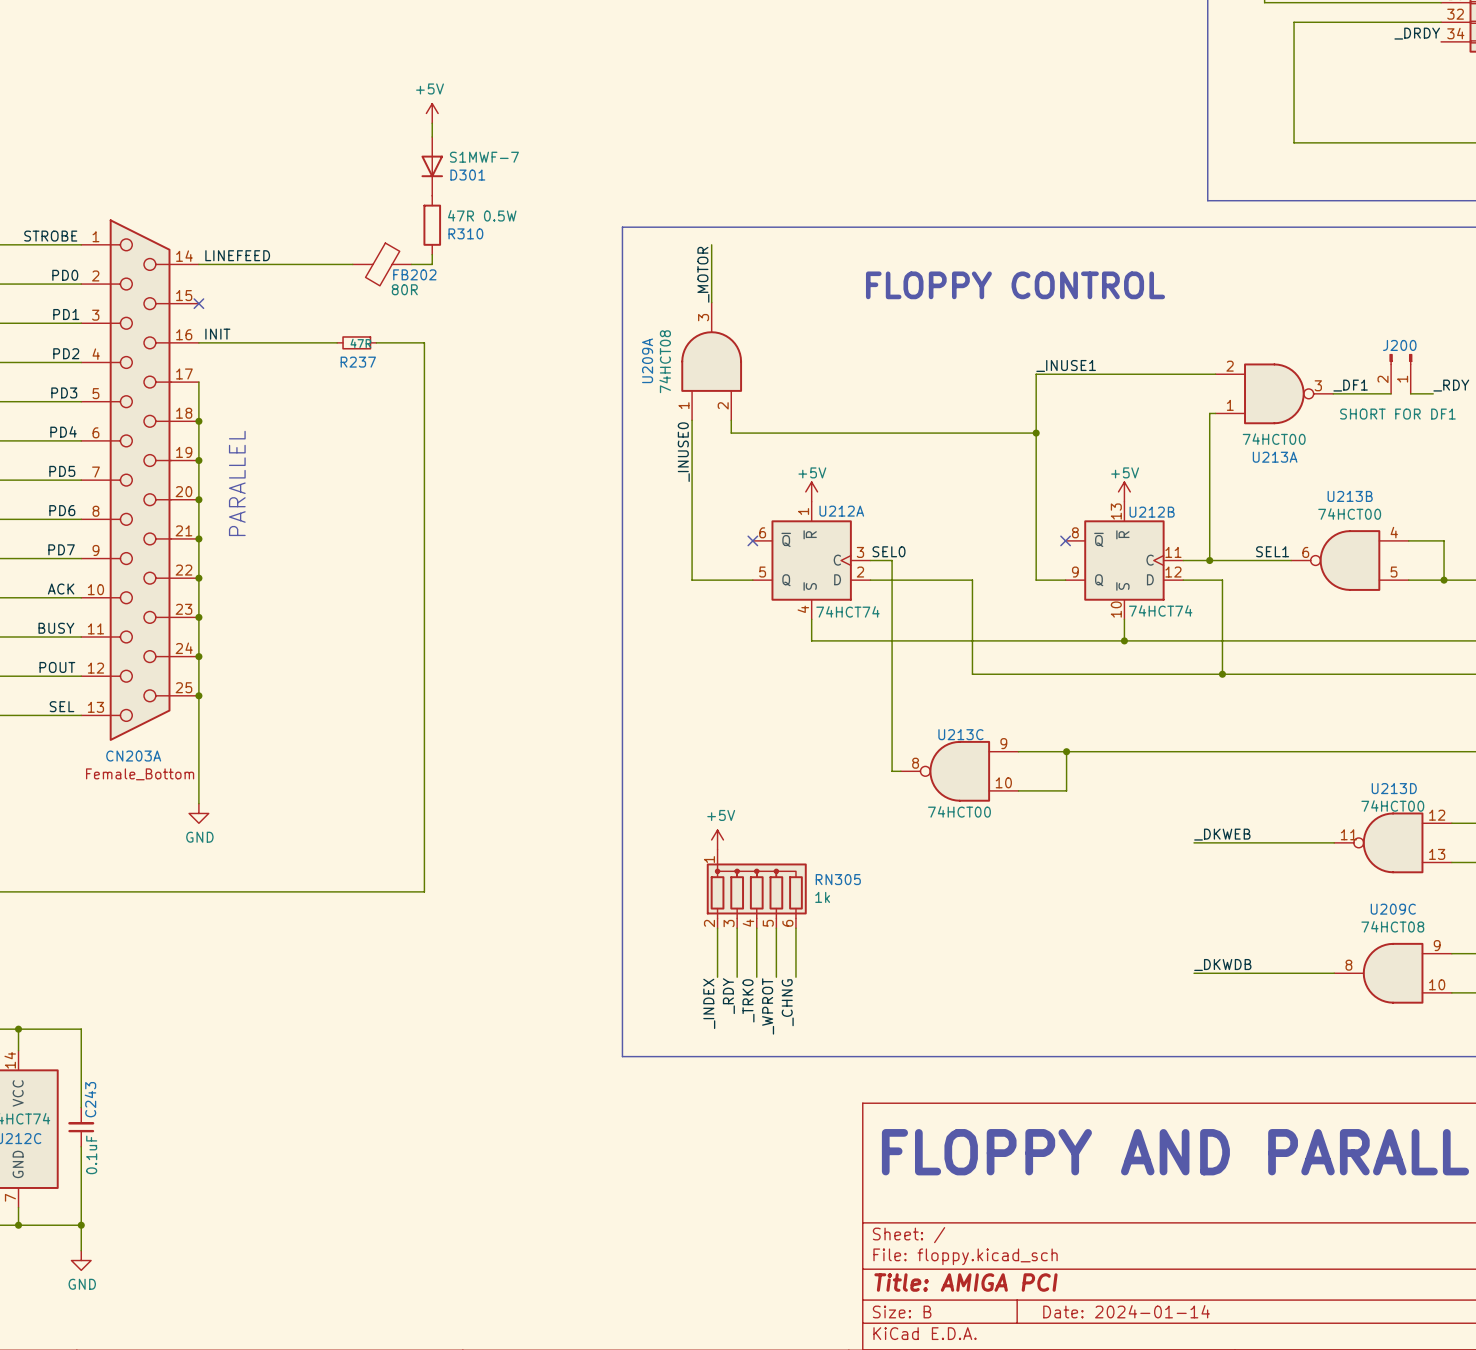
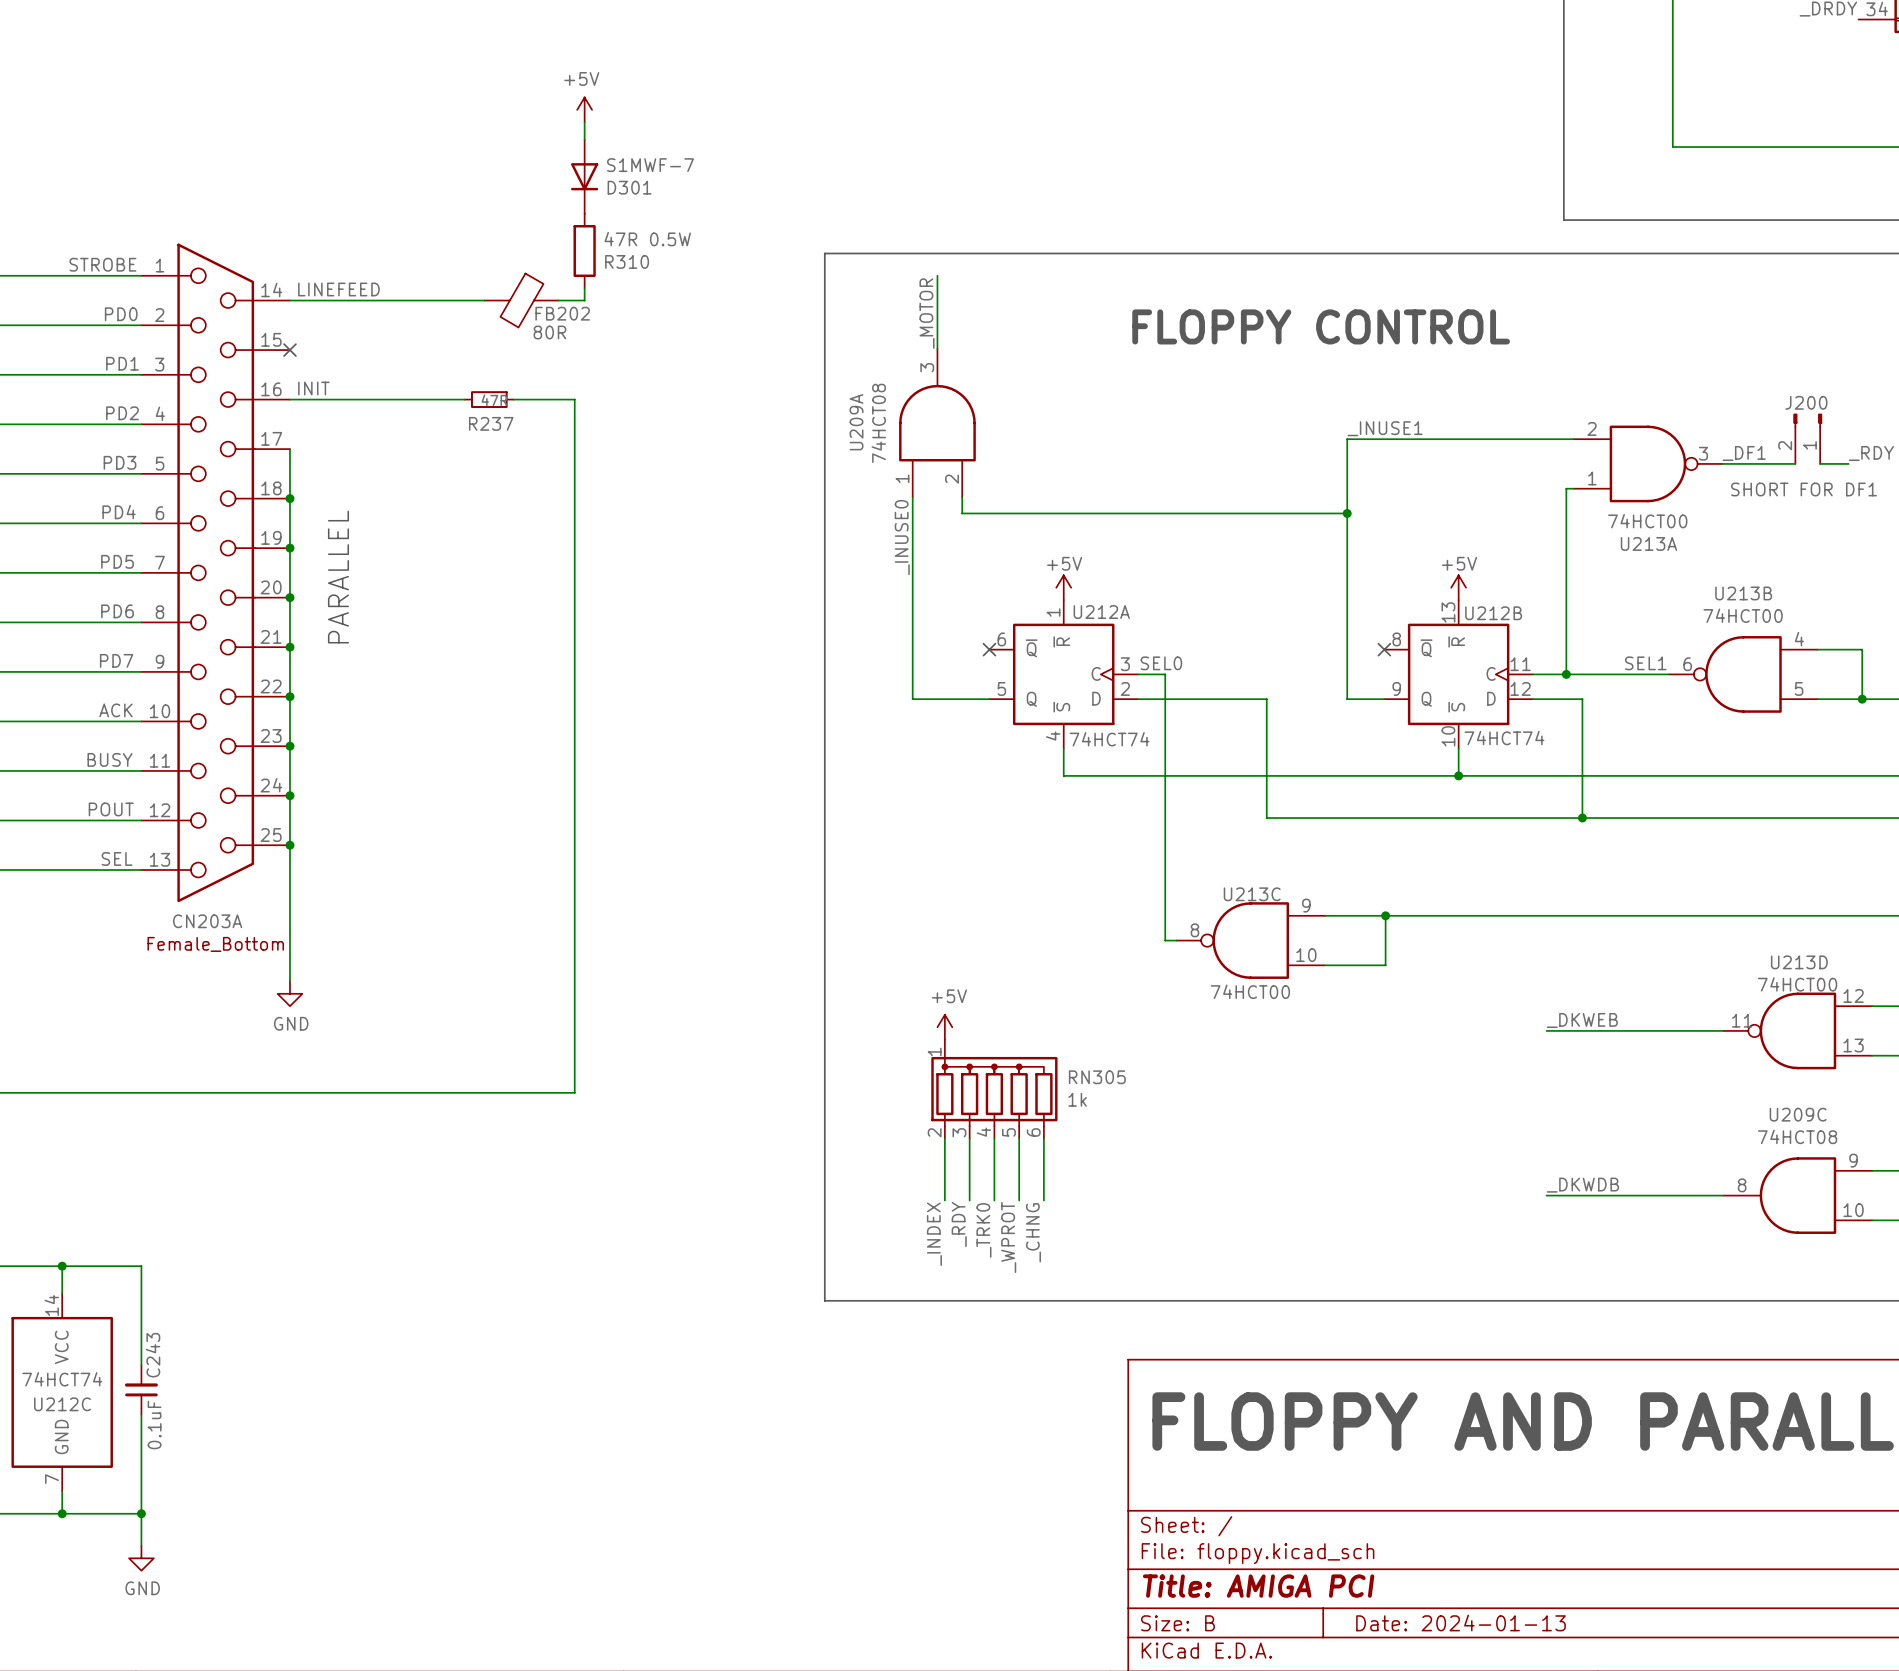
title block: Date: 2024-01-14 (1126, 1311) -> Date: 2024-01-13 (1461, 1622)

